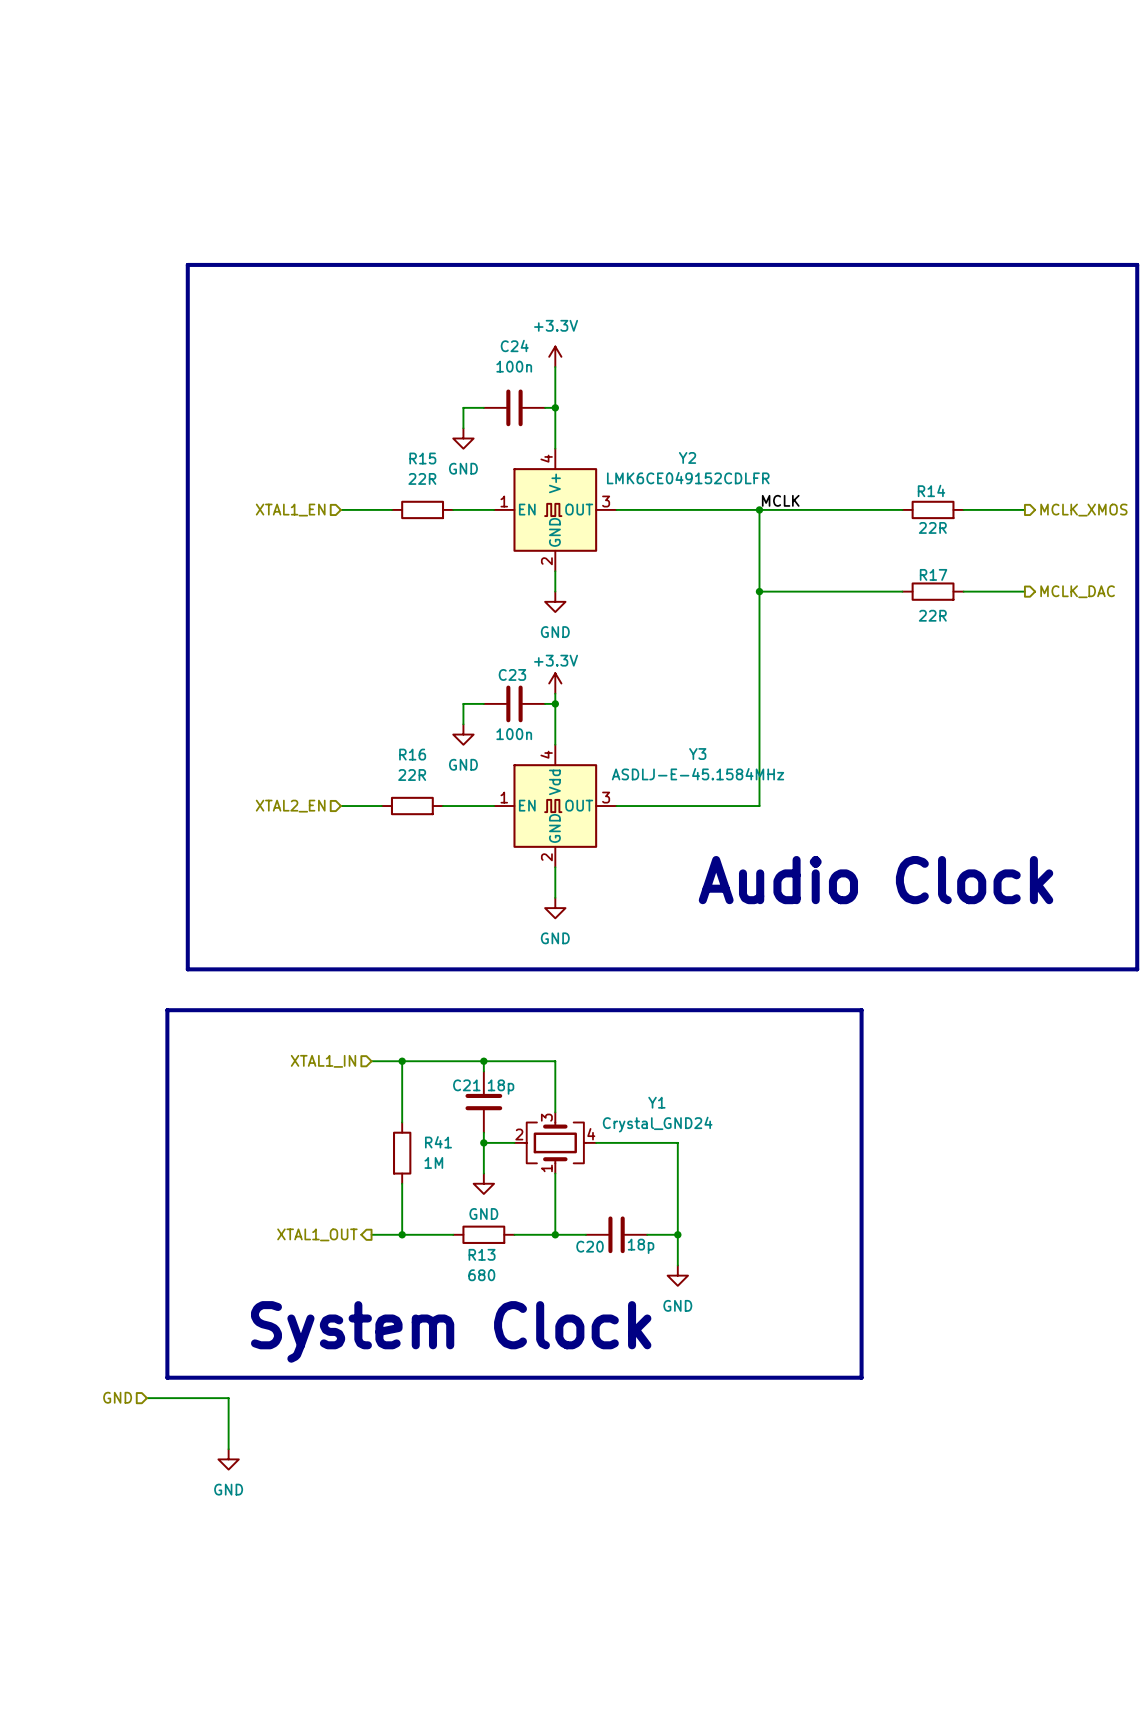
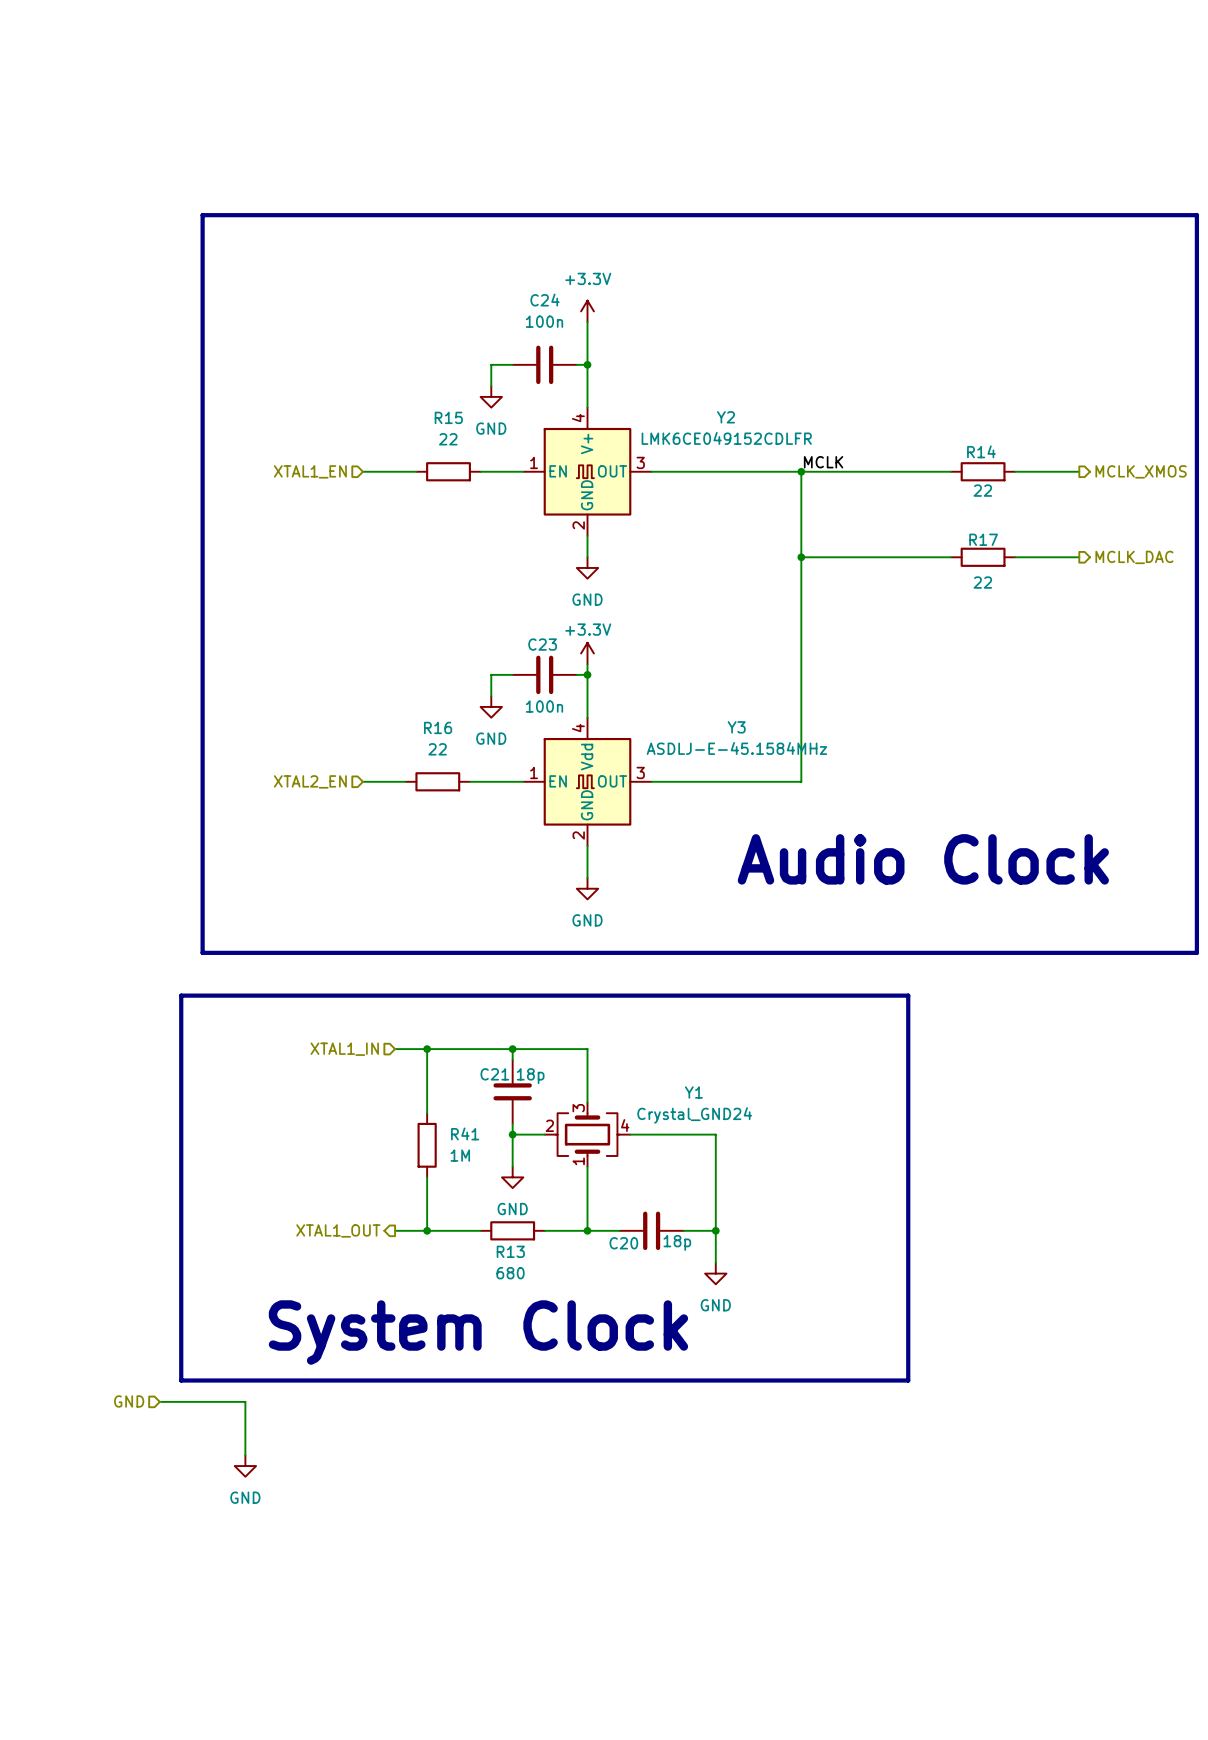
R15 value: 22R (422, 478) -> 22 (448, 439)
R14 value: 22R (932, 527) -> 22 (982, 490)
R17 value: 22R (932, 615) -> 22 (982, 582)
R16 value: 22R (412, 775) -> 22 (437, 749)

